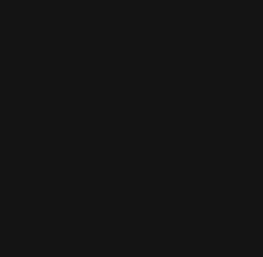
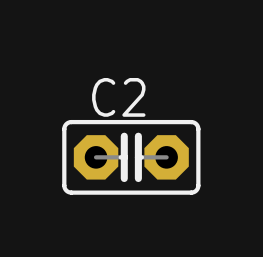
C2: none -> (131, 157)

